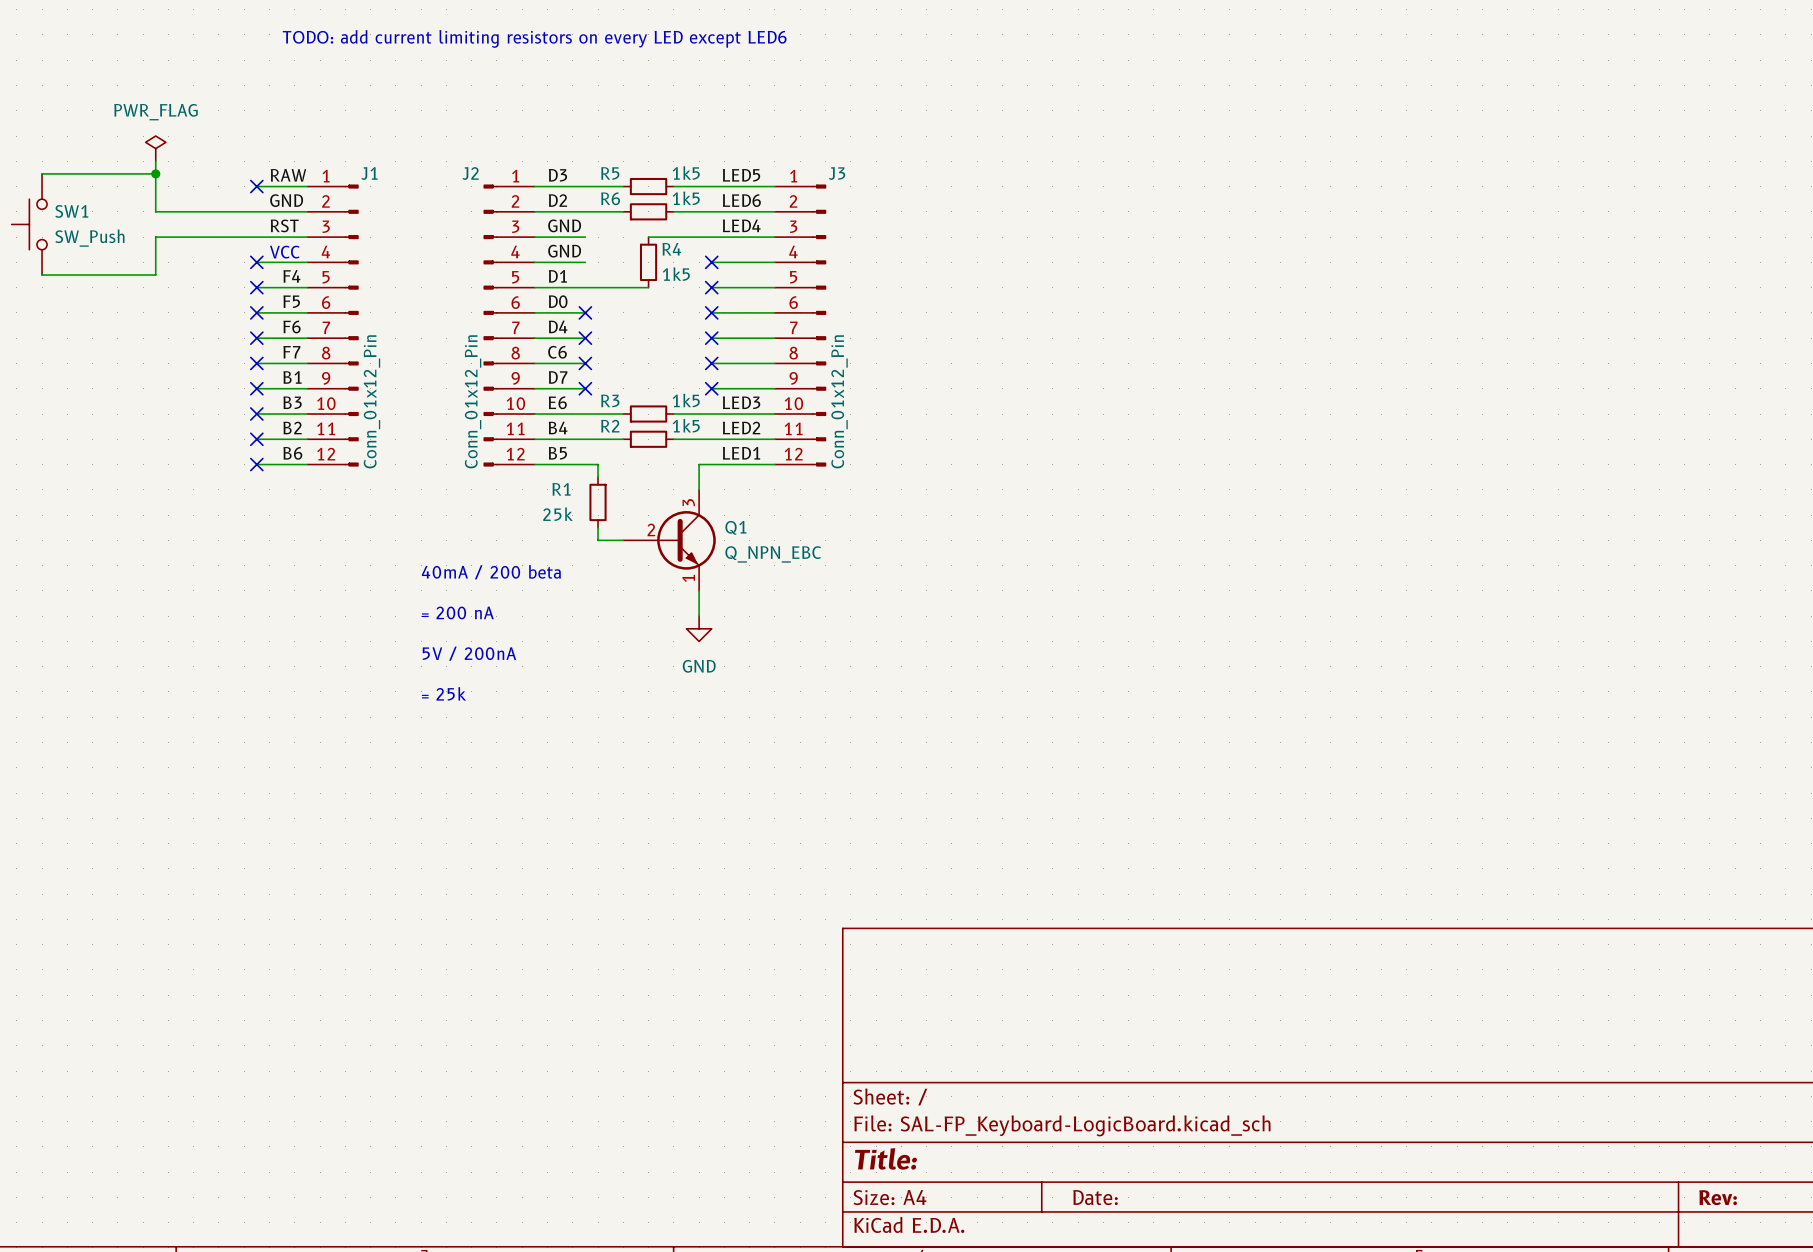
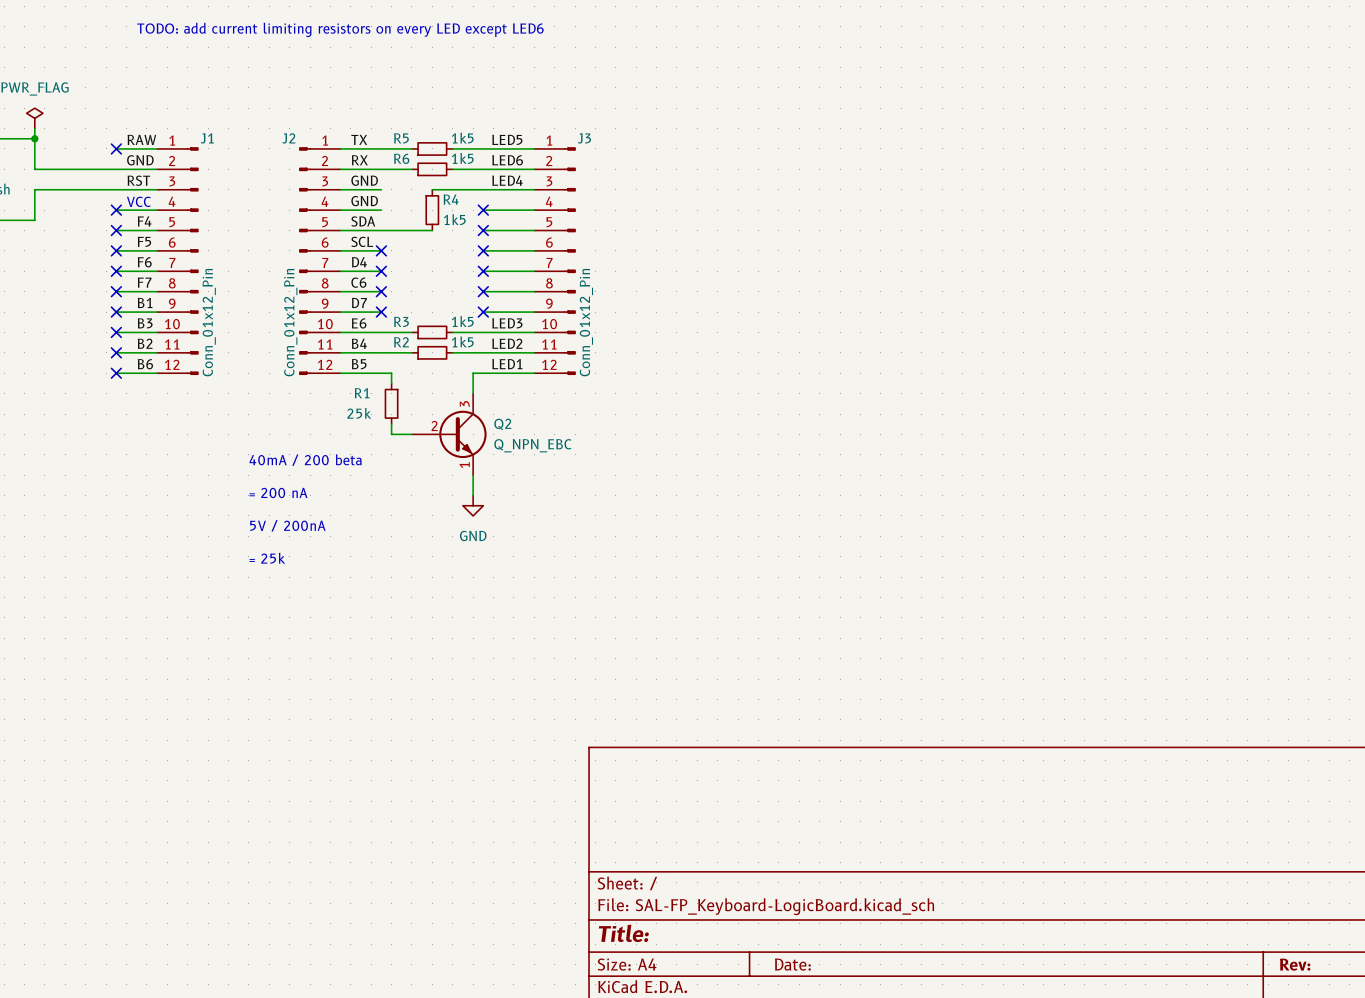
label: D3 (557, 175) -> TX (359, 139)
label: D2 (557, 200) -> RX (359, 160)
label: D1 (557, 276) -> SDA (363, 221)
label: D0 (558, 301) -> SCL (362, 241)
Q1 name: Q1 (735, 527) -> Q2 (502, 424)

